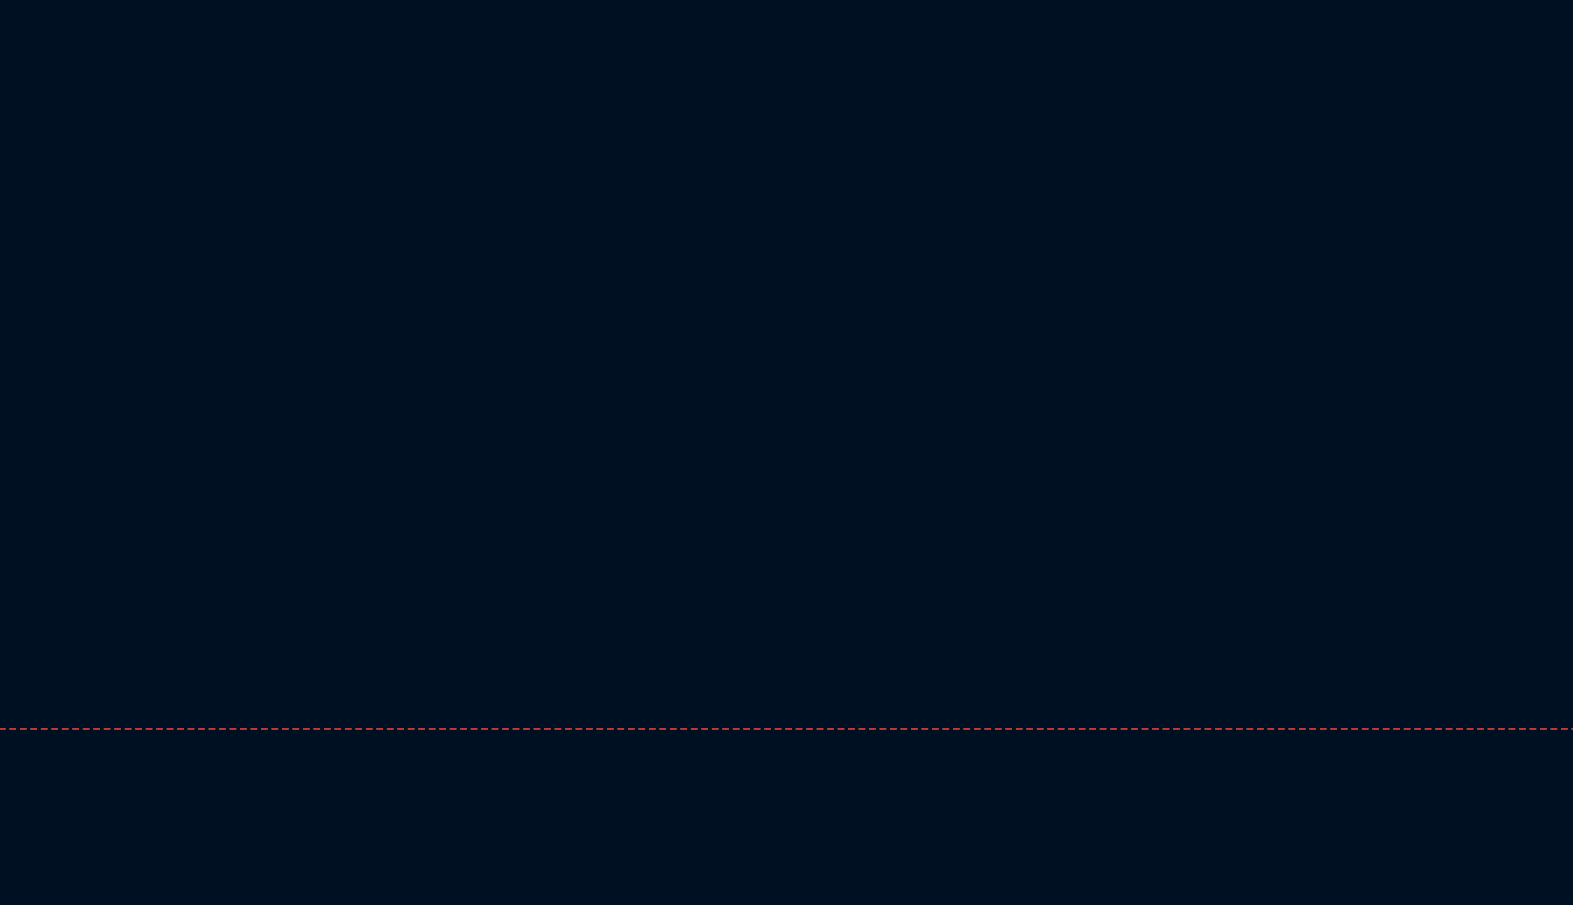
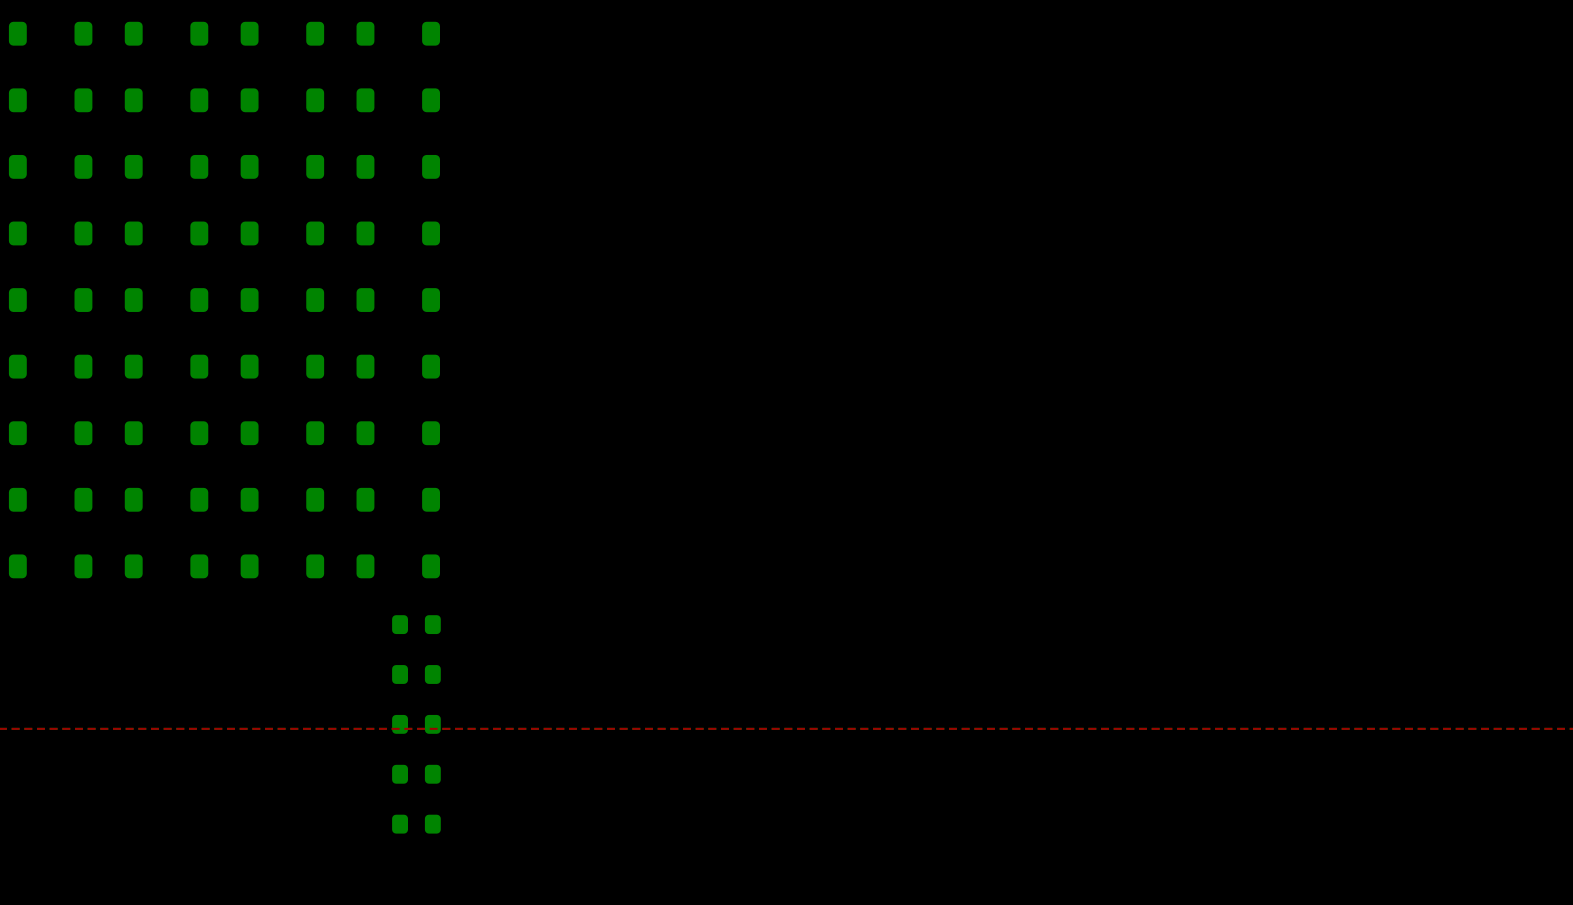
part: none -> (50, 33)
part: none -> (166, 33)
part: none -> (282, 33)
part: none -> (398, 33)
part: none -> (50, 100)
part: none -> (166, 100)
part: none -> (282, 100)
part: none -> (398, 100)
part: none -> (50, 166)
part: none -> (166, 166)
part: none -> (282, 166)
part: none -> (398, 166)
part: none -> (50, 233)
part: none -> (166, 233)
part: none -> (282, 233)
part: none -> (398, 233)
part: none -> (50, 300)
part: none -> (166, 300)
part: none -> (282, 300)
part: none -> (398, 300)
part: none -> (50, 366)
part: none -> (166, 366)
part: none -> (282, 366)
part: none -> (398, 366)
part: none -> (50, 433)
part: none -> (166, 433)
part: none -> (282, 433)
part: none -> (398, 433)
part: none -> (50, 499)
part: none -> (166, 499)
part: none -> (282, 499)
part: none -> (398, 499)
part: none -> (50, 566)
part: none -> (166, 566)
part: none -> (282, 566)
part: none -> (398, 566)
part: none -> (416, 624)
part: none -> (416, 674)
part: none -> (416, 724)
part: none -> (416, 774)
part: none -> (416, 824)

